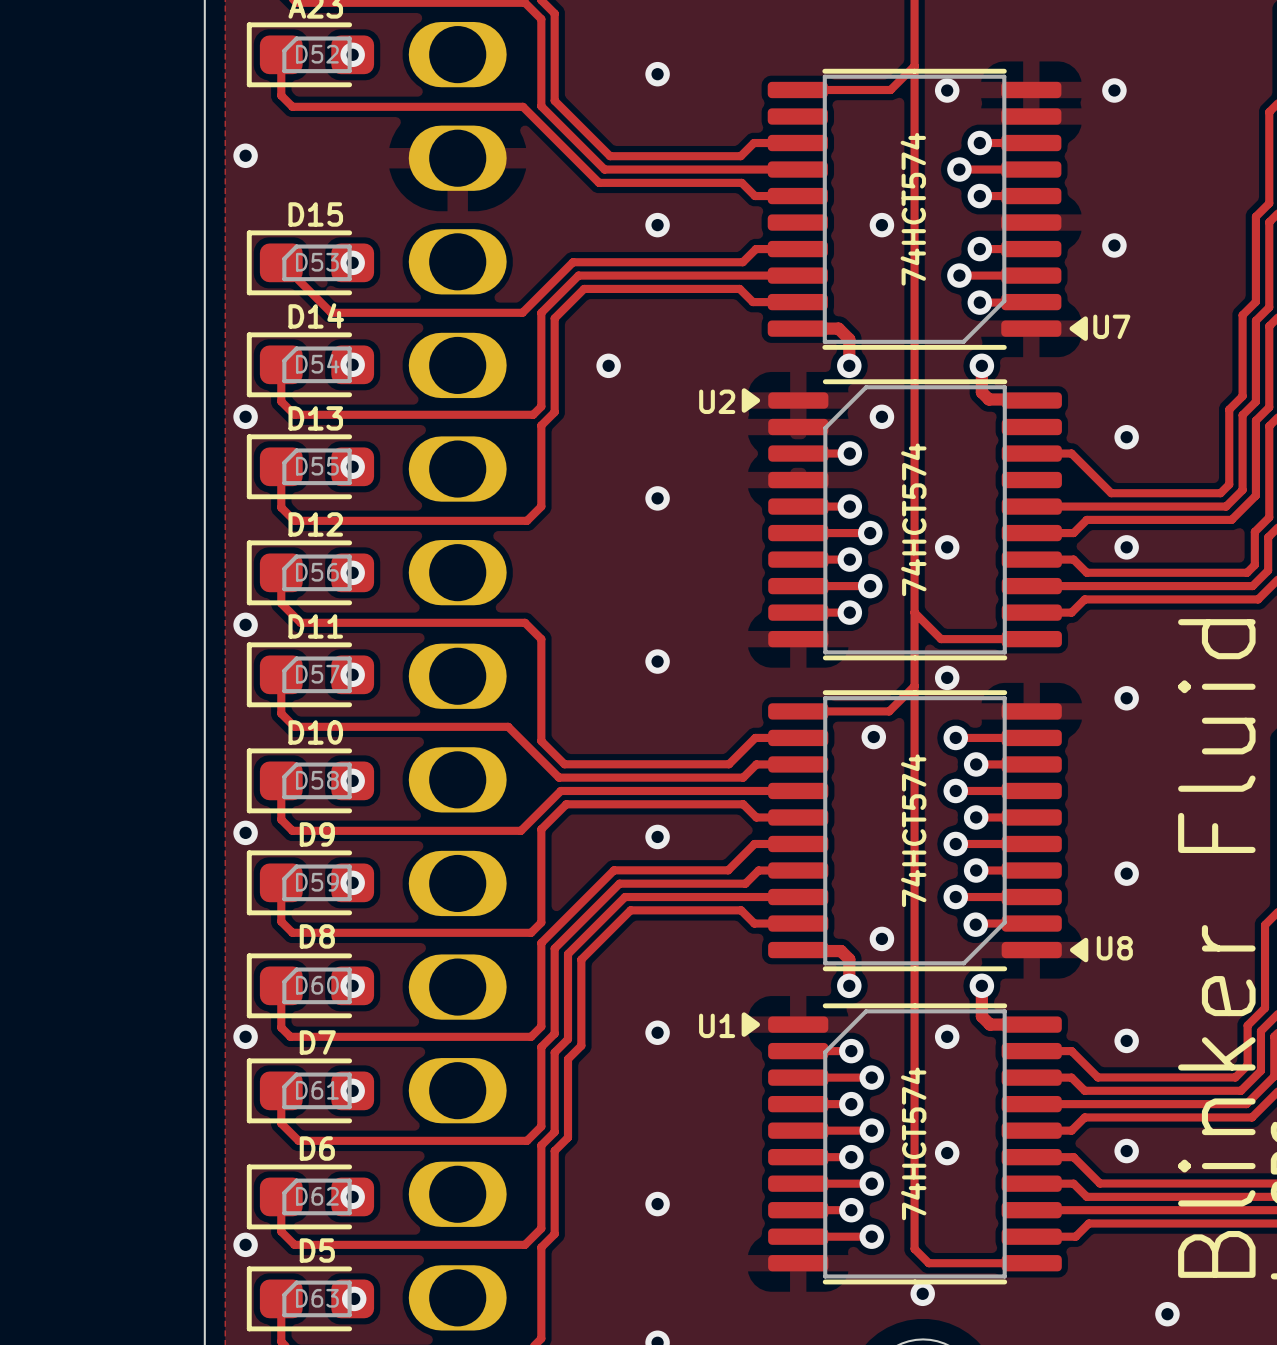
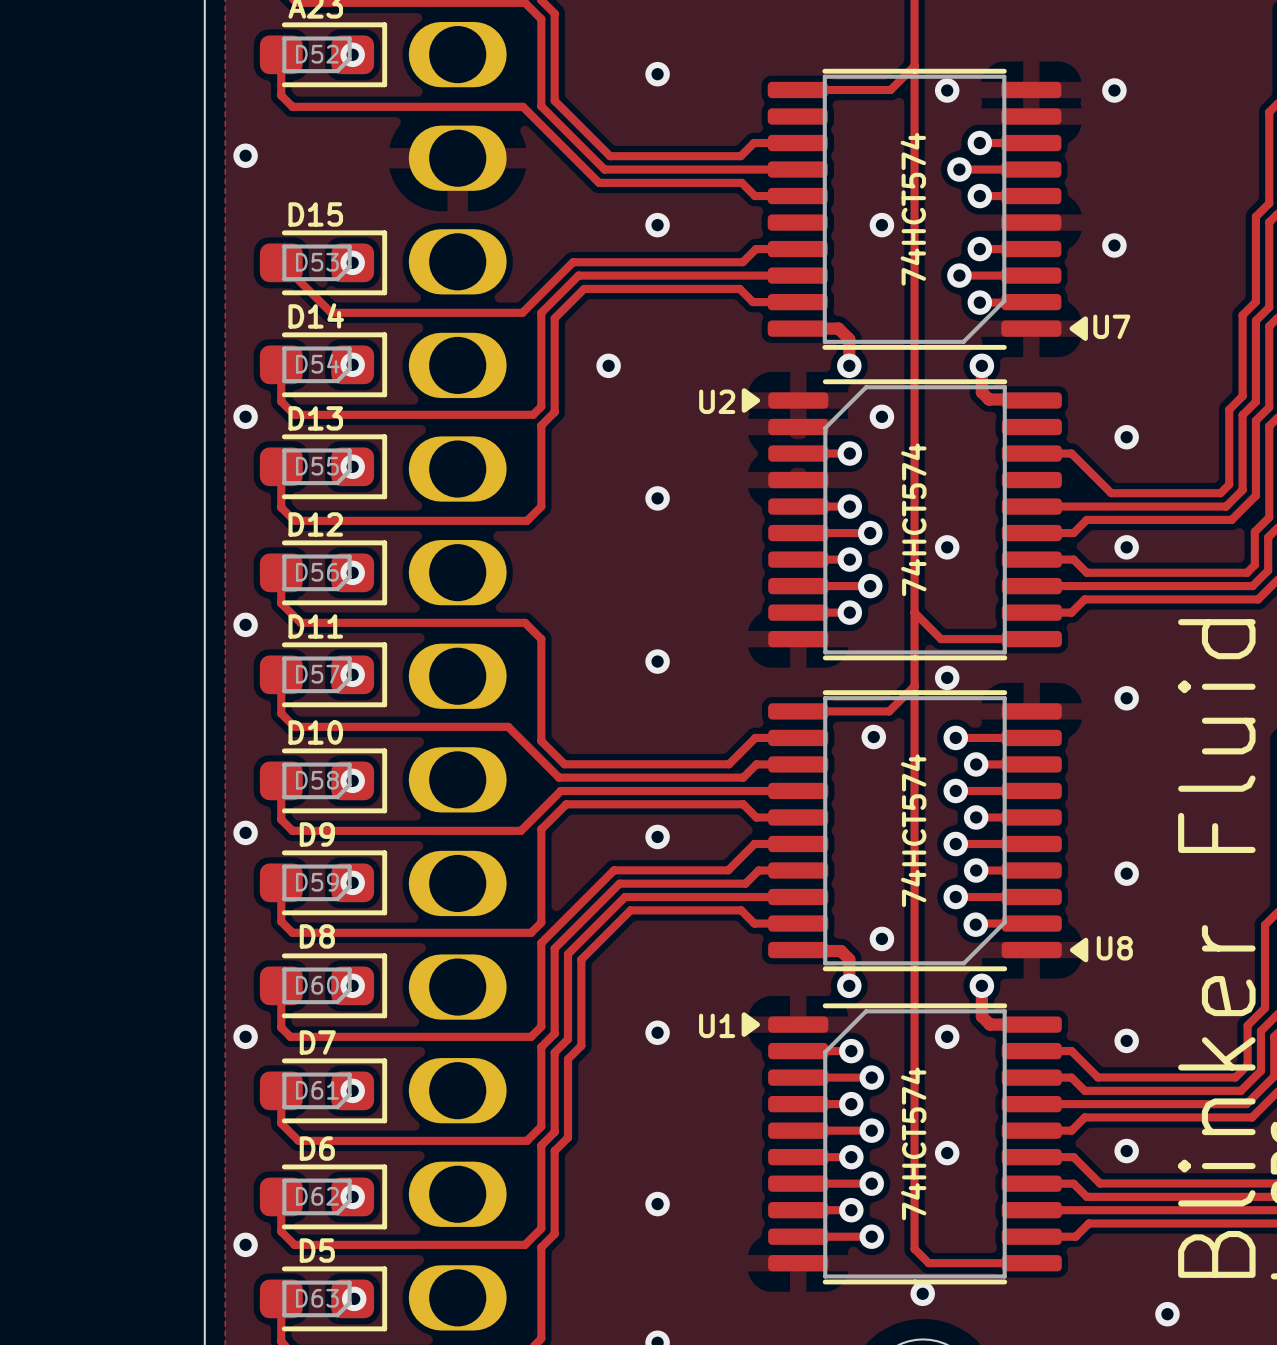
D52 rotation: 0° (310, 54) -> 180° (323, 54)
D53 rotation: 0° (310, 262) -> 180° (323, 262)
D54 rotation: 0° (310, 364) -> 180° (323, 364)
D55 rotation: 0° (310, 466) -> 180° (323, 466)
D56 rotation: 0° (310, 572) -> 180° (323, 572)
D57 rotation: 0° (310, 674) -> 180° (323, 674)
D58 rotation: 0° (310, 780) -> 180° (323, 780)
D59 rotation: 0° (310, 882) -> 180° (323, 882)
D60 rotation: 0° (310, 985) -> 180° (323, 985)
D61 rotation: 0° (310, 1090) -> 180° (323, 1090)
D62 rotation: 0° (310, 1196) -> 180° (323, 1196)
D63 rotation: 0° (310, 1298) -> 180° (323, 1298)

